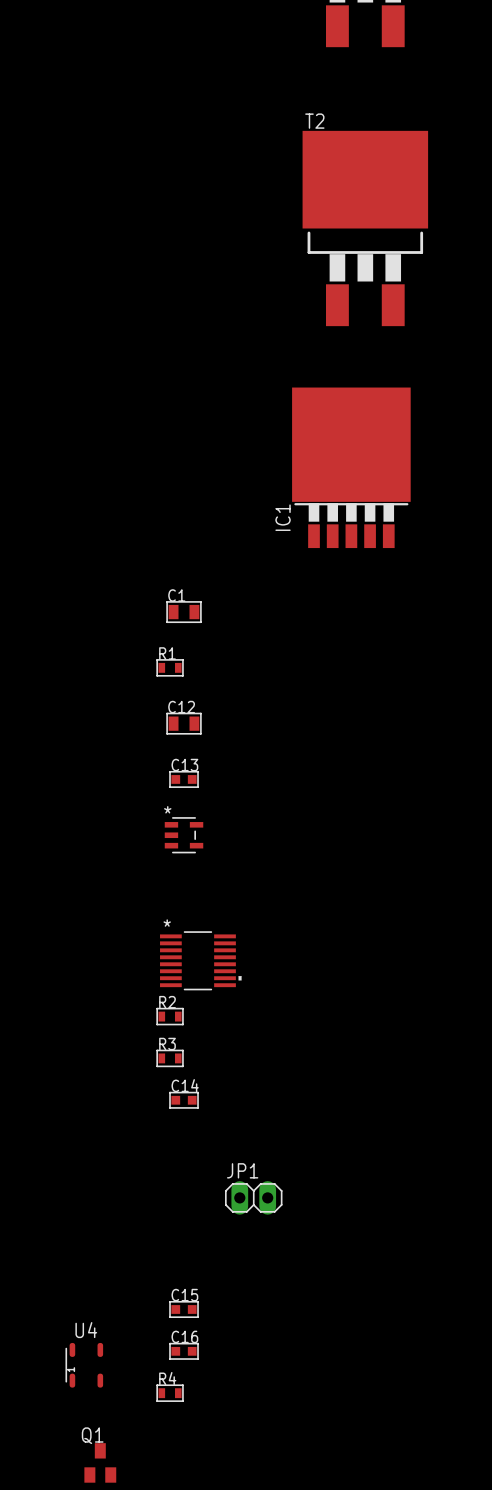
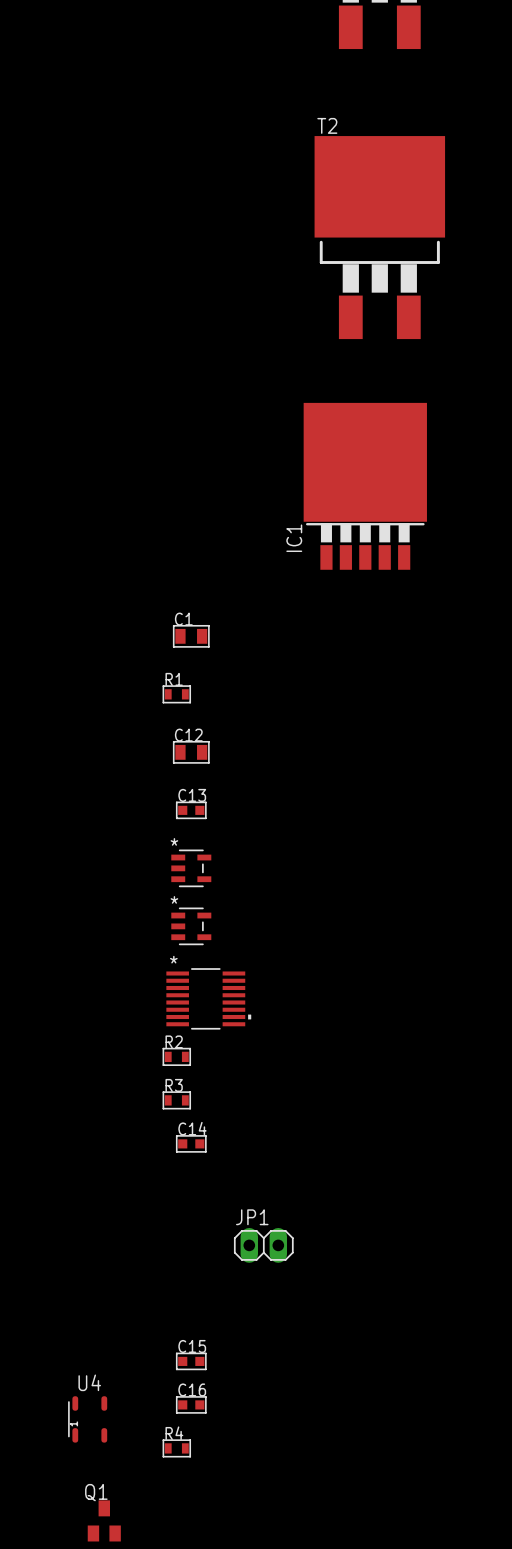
part: none -> (191, 926)

